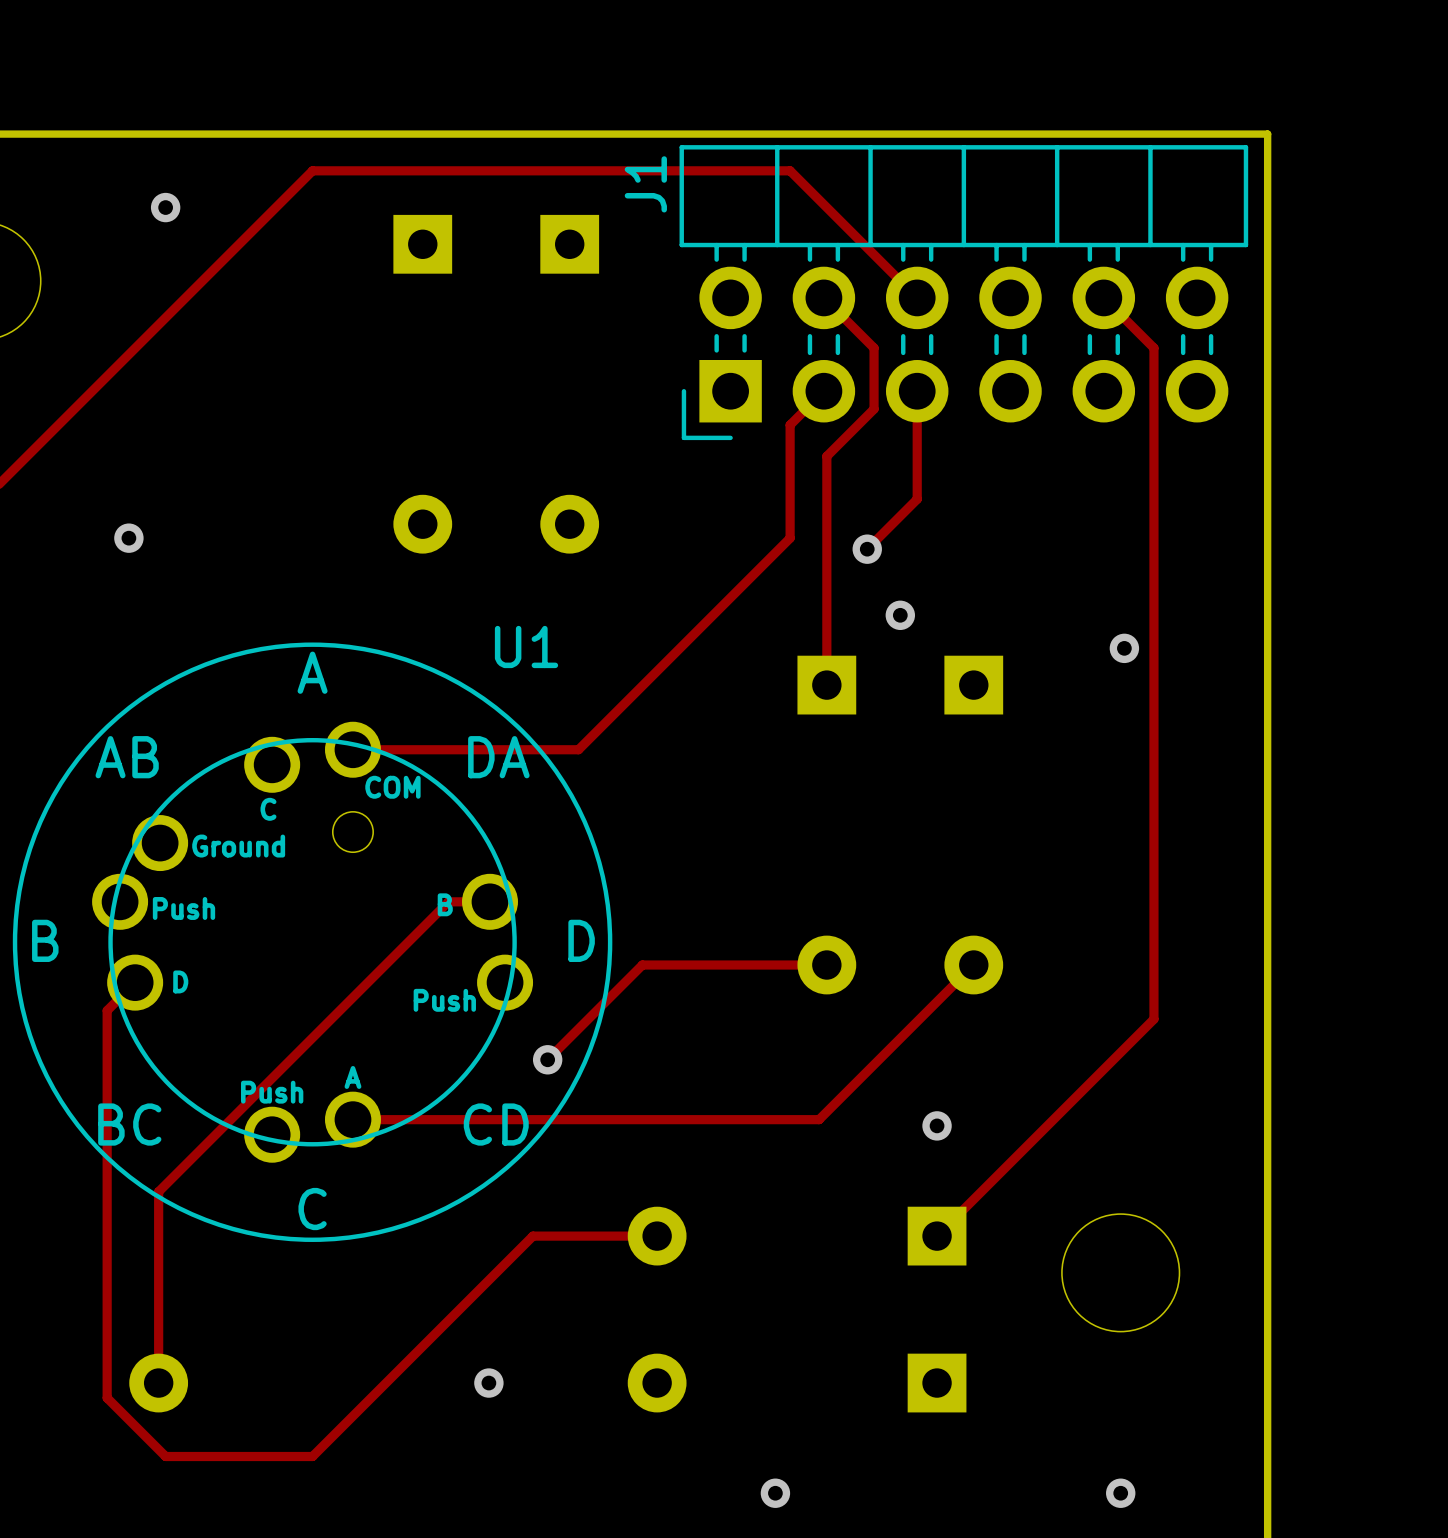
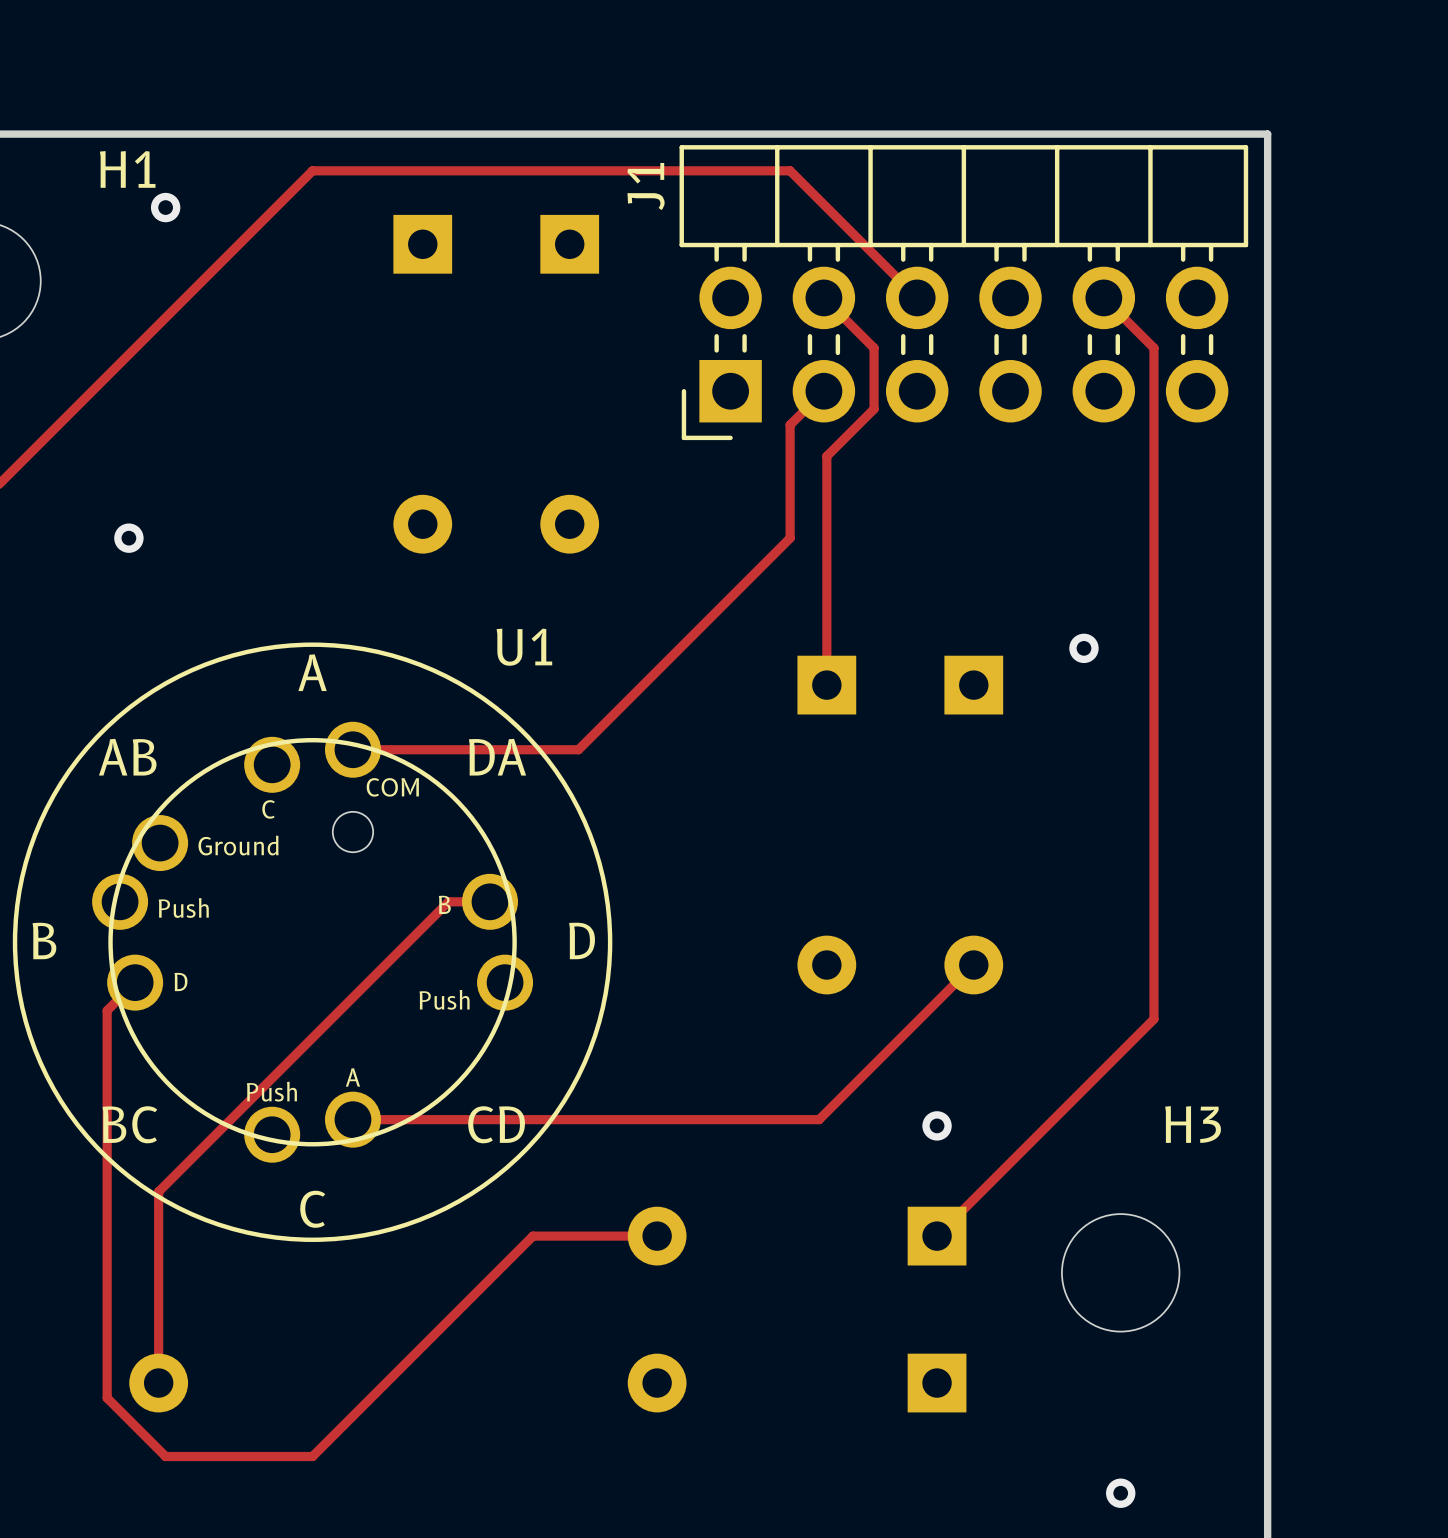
H1 name: none -> H1 (127, 169)
track: (917, 391) (917, 499) (867, 549) -> none
via: (867, 549) -> none
via: (900, 615) -> none
via position: (1124, 648) -> (1083, 648)
track: (826, 965) (642, 965) (547, 1059) -> none
via: (547, 1059) -> none
H3 name: none -> H3 (1193, 1124)
via: (488, 1383) -> none
via: (775, 1493) -> none

